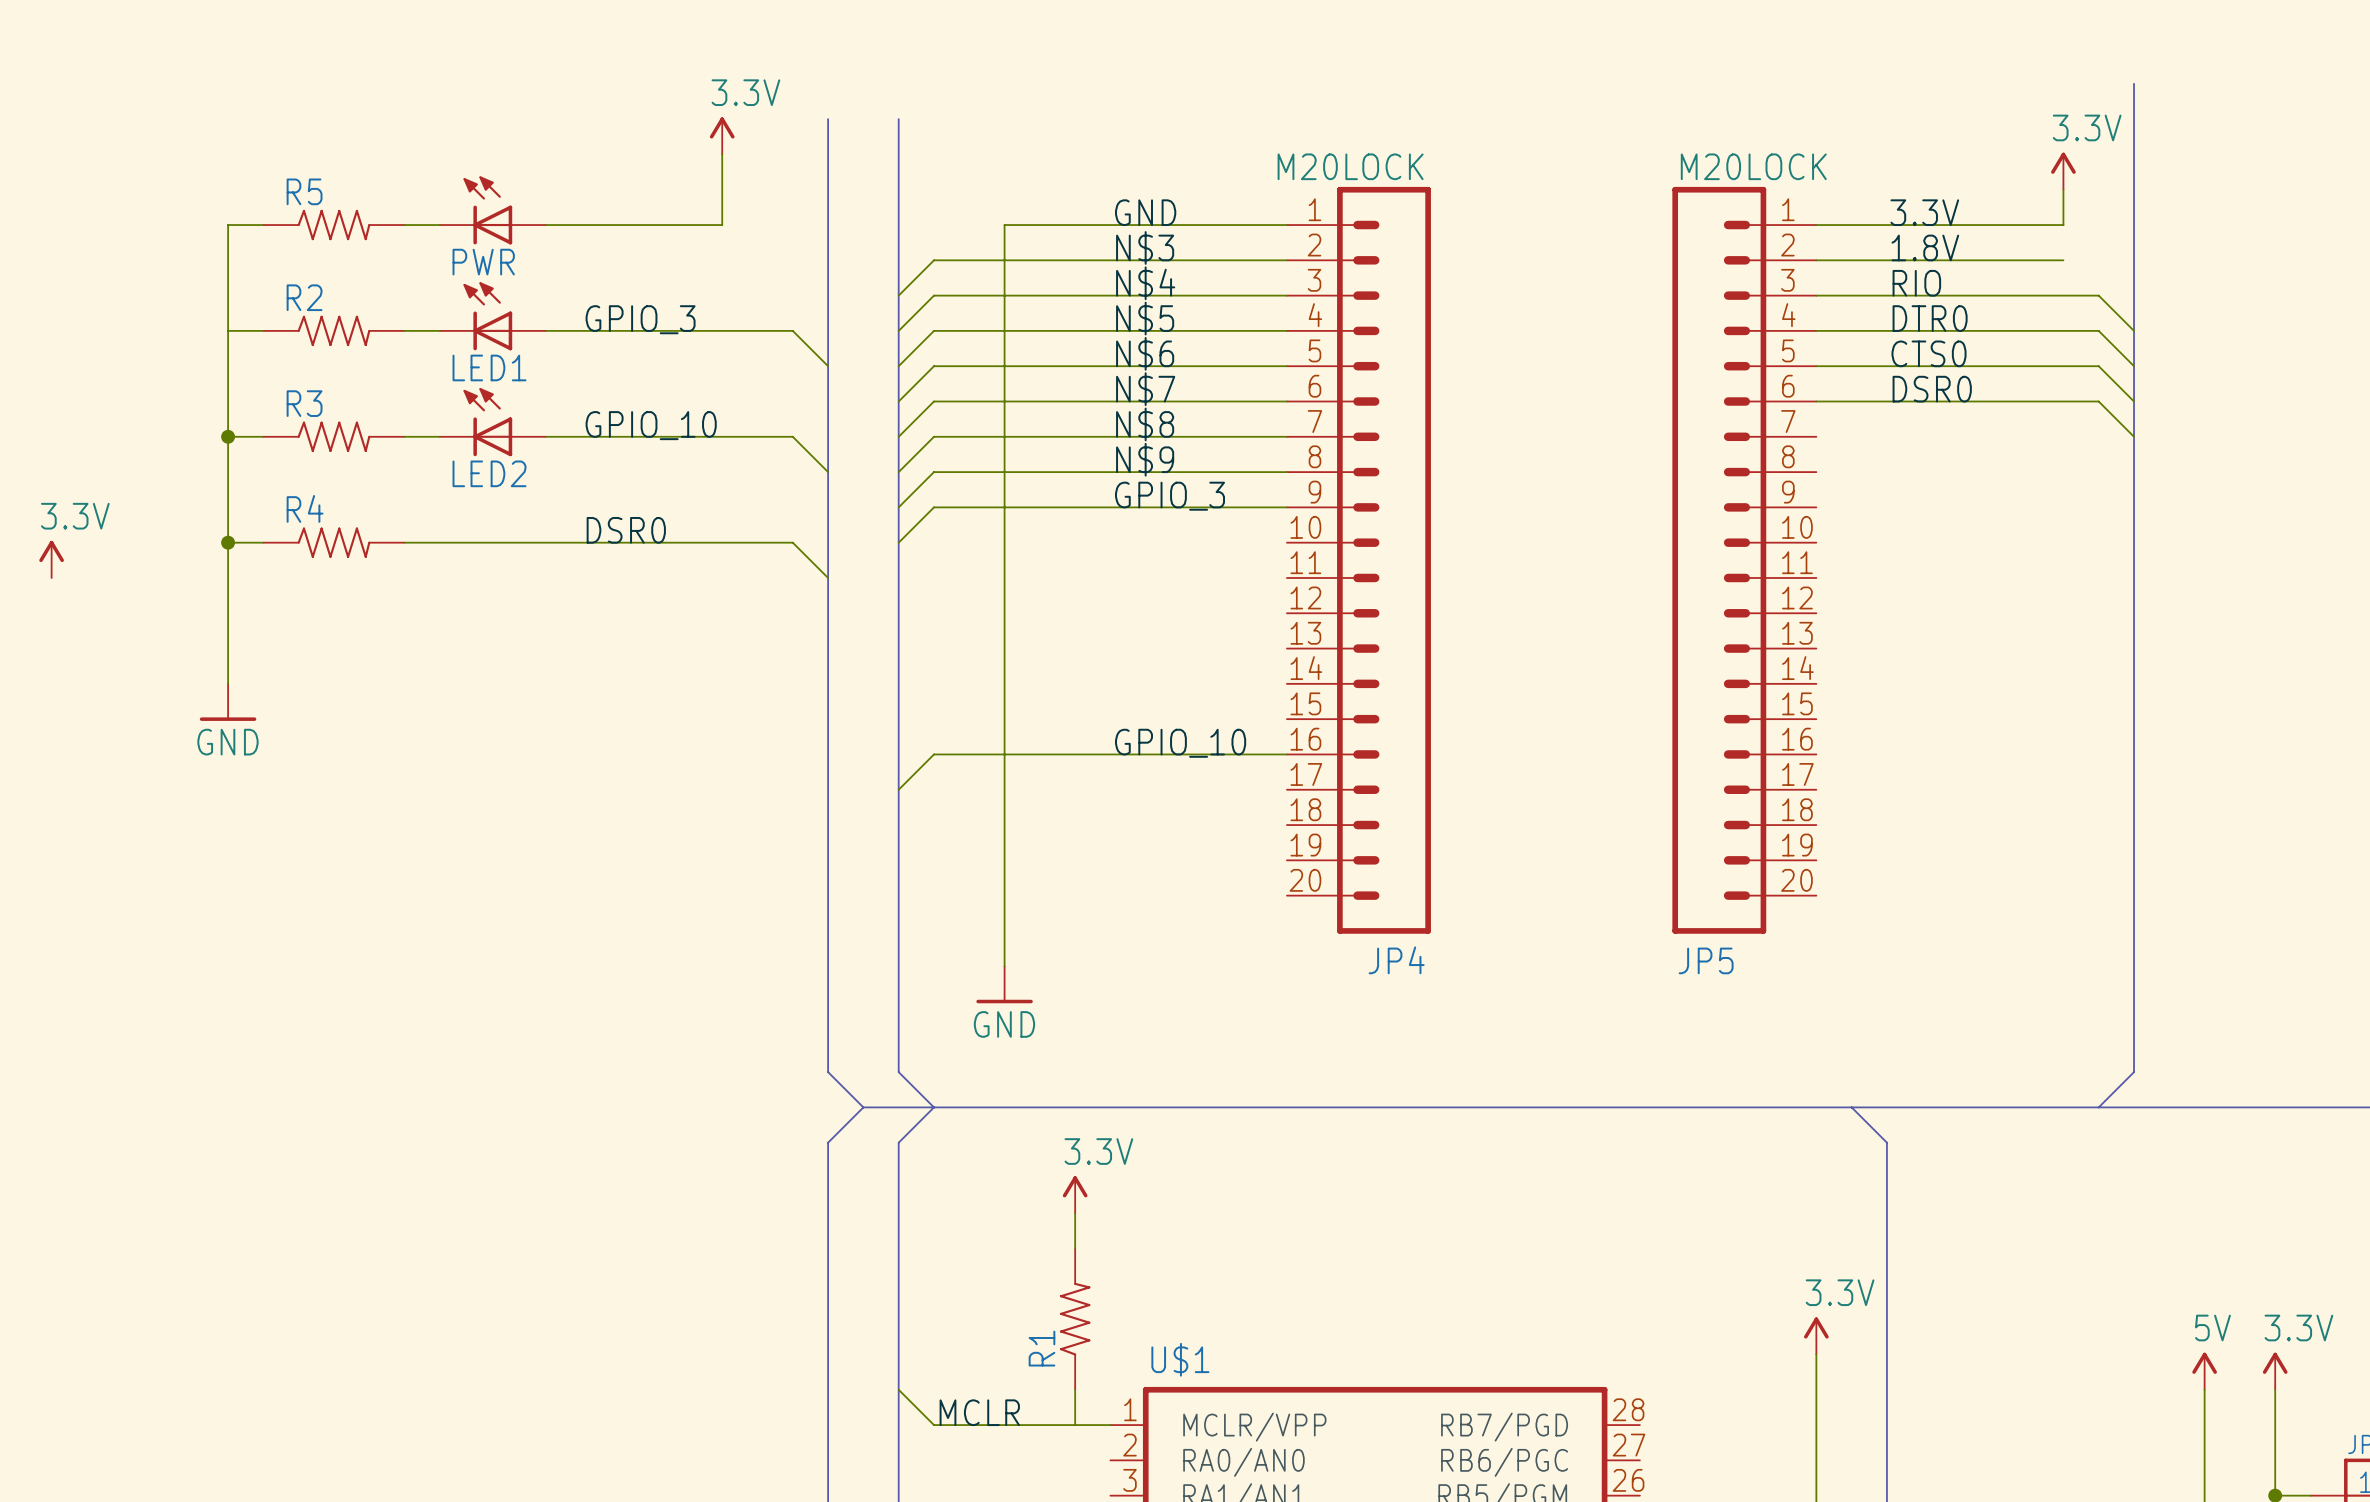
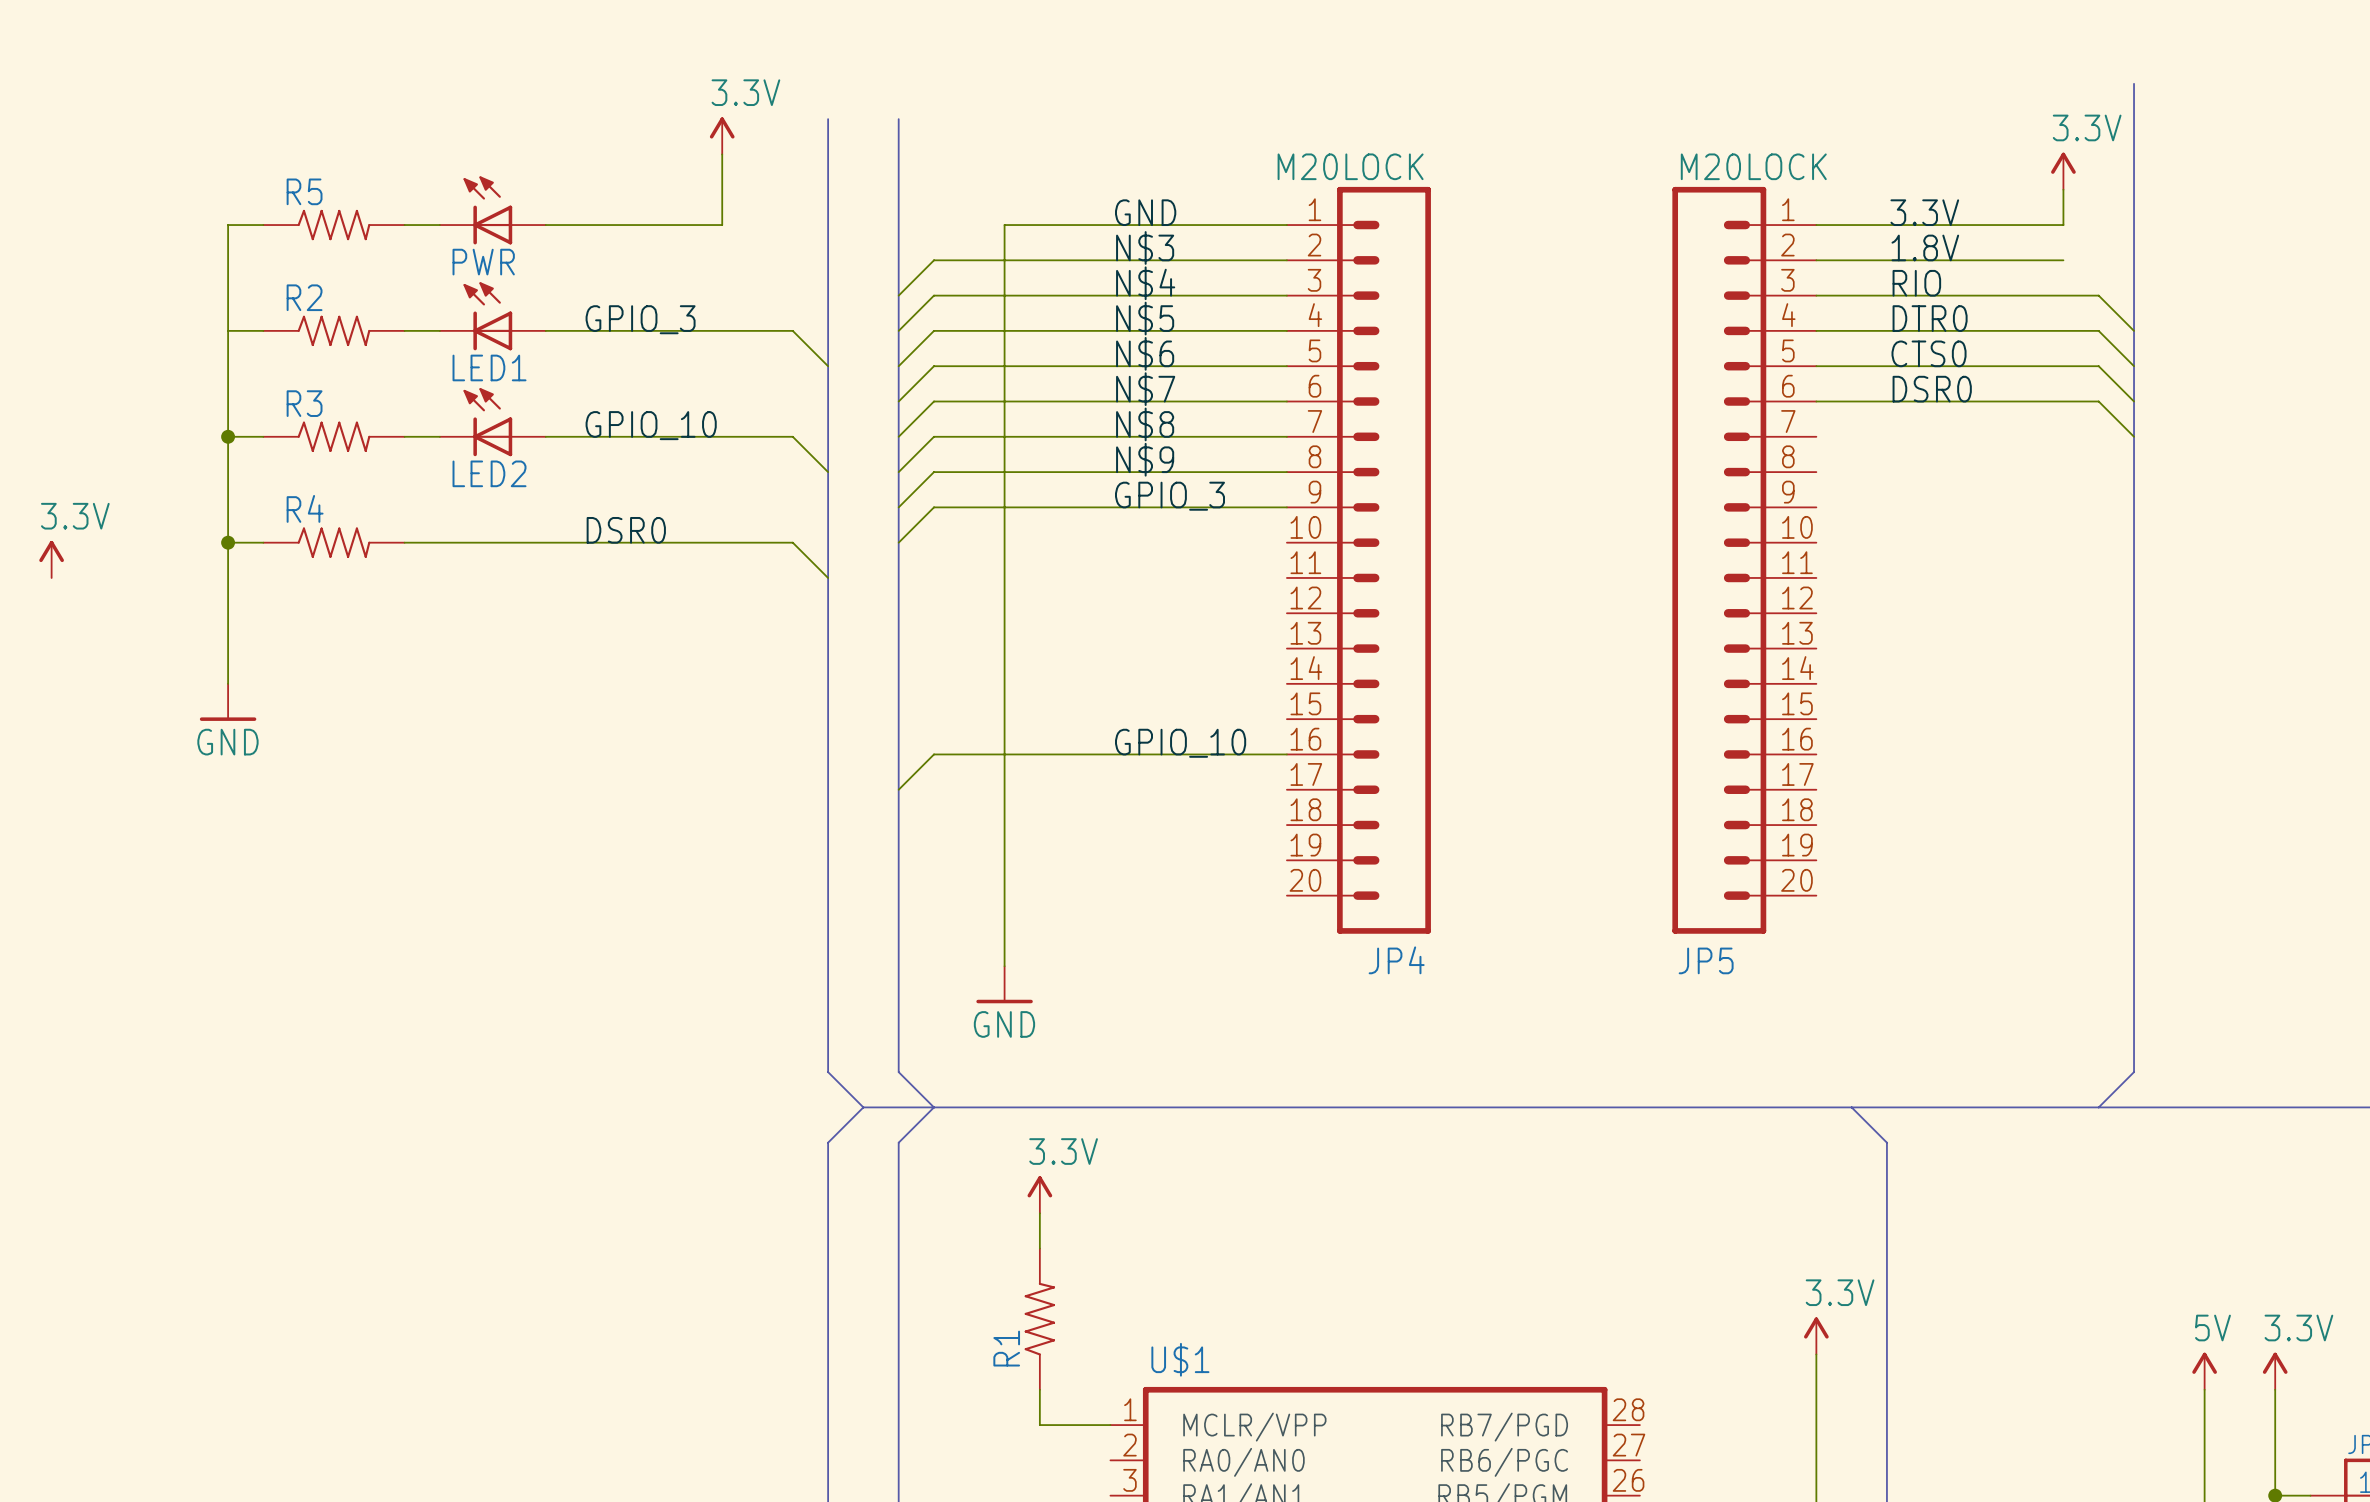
power symbol position: 3.3V (1075, 1194) -> 3.3V (1039, 1194)
wire: (1075, 1213) (1075, 1248) -> (1039, 1213) (1039, 1248)
R1 position: (1075, 1319) -> (1039, 1319)
wire: (898, 1389) (933, 1425) (1039, 1425) -> (1039, 1389) (1039, 1425)
wire: (1075, 1389) (1075, 1425) -> none
label: MCLR (979, 1412) -> none

